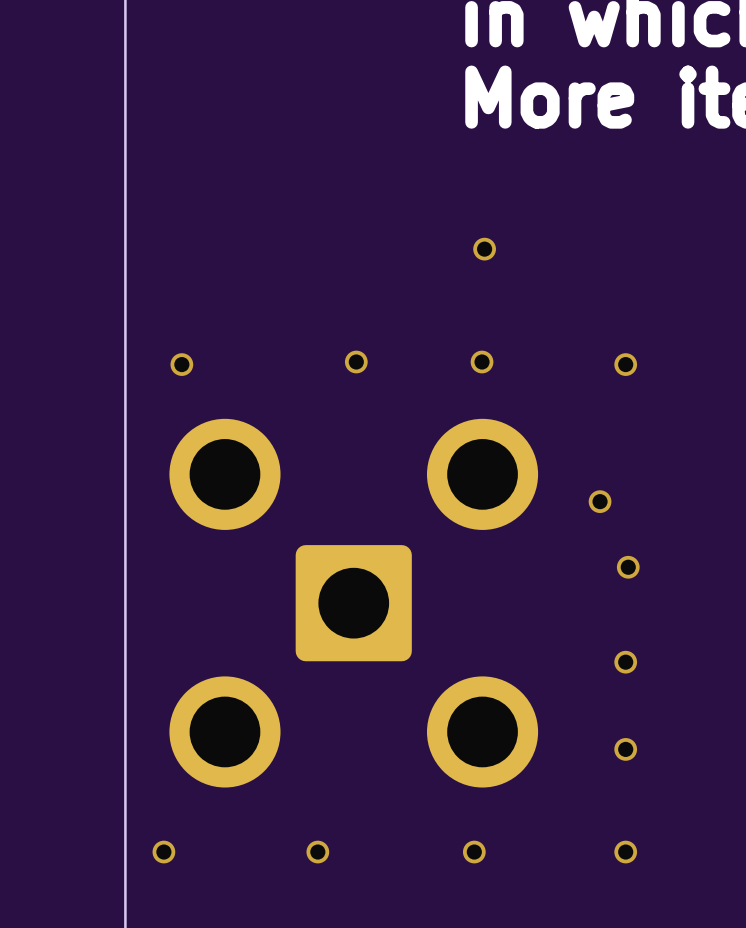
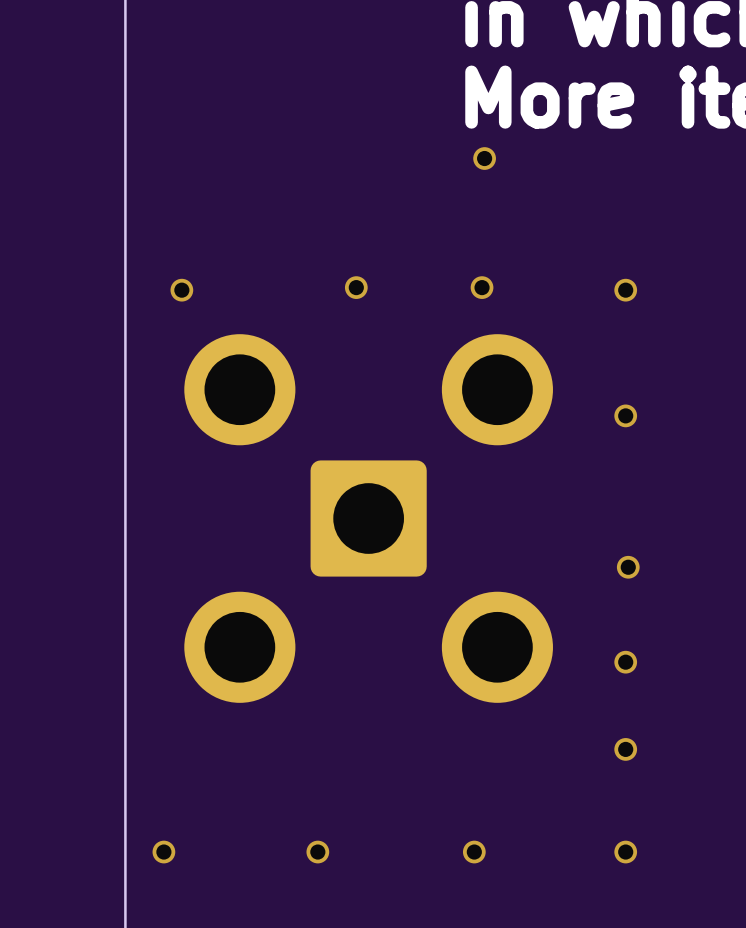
via: none -> (484, 158)
via: (484, 249) -> none
via: none -> (356, 287)
via: none -> (482, 287)
via: none -> (625, 290)
via: (356, 362) -> none
via: (482, 362) -> none
via position: (181, 364) -> (181, 290)
via: (625, 364) -> none
via: none -> (625, 415)
via: (600, 501) -> none
part position: (353, 603) -> (368, 518)

